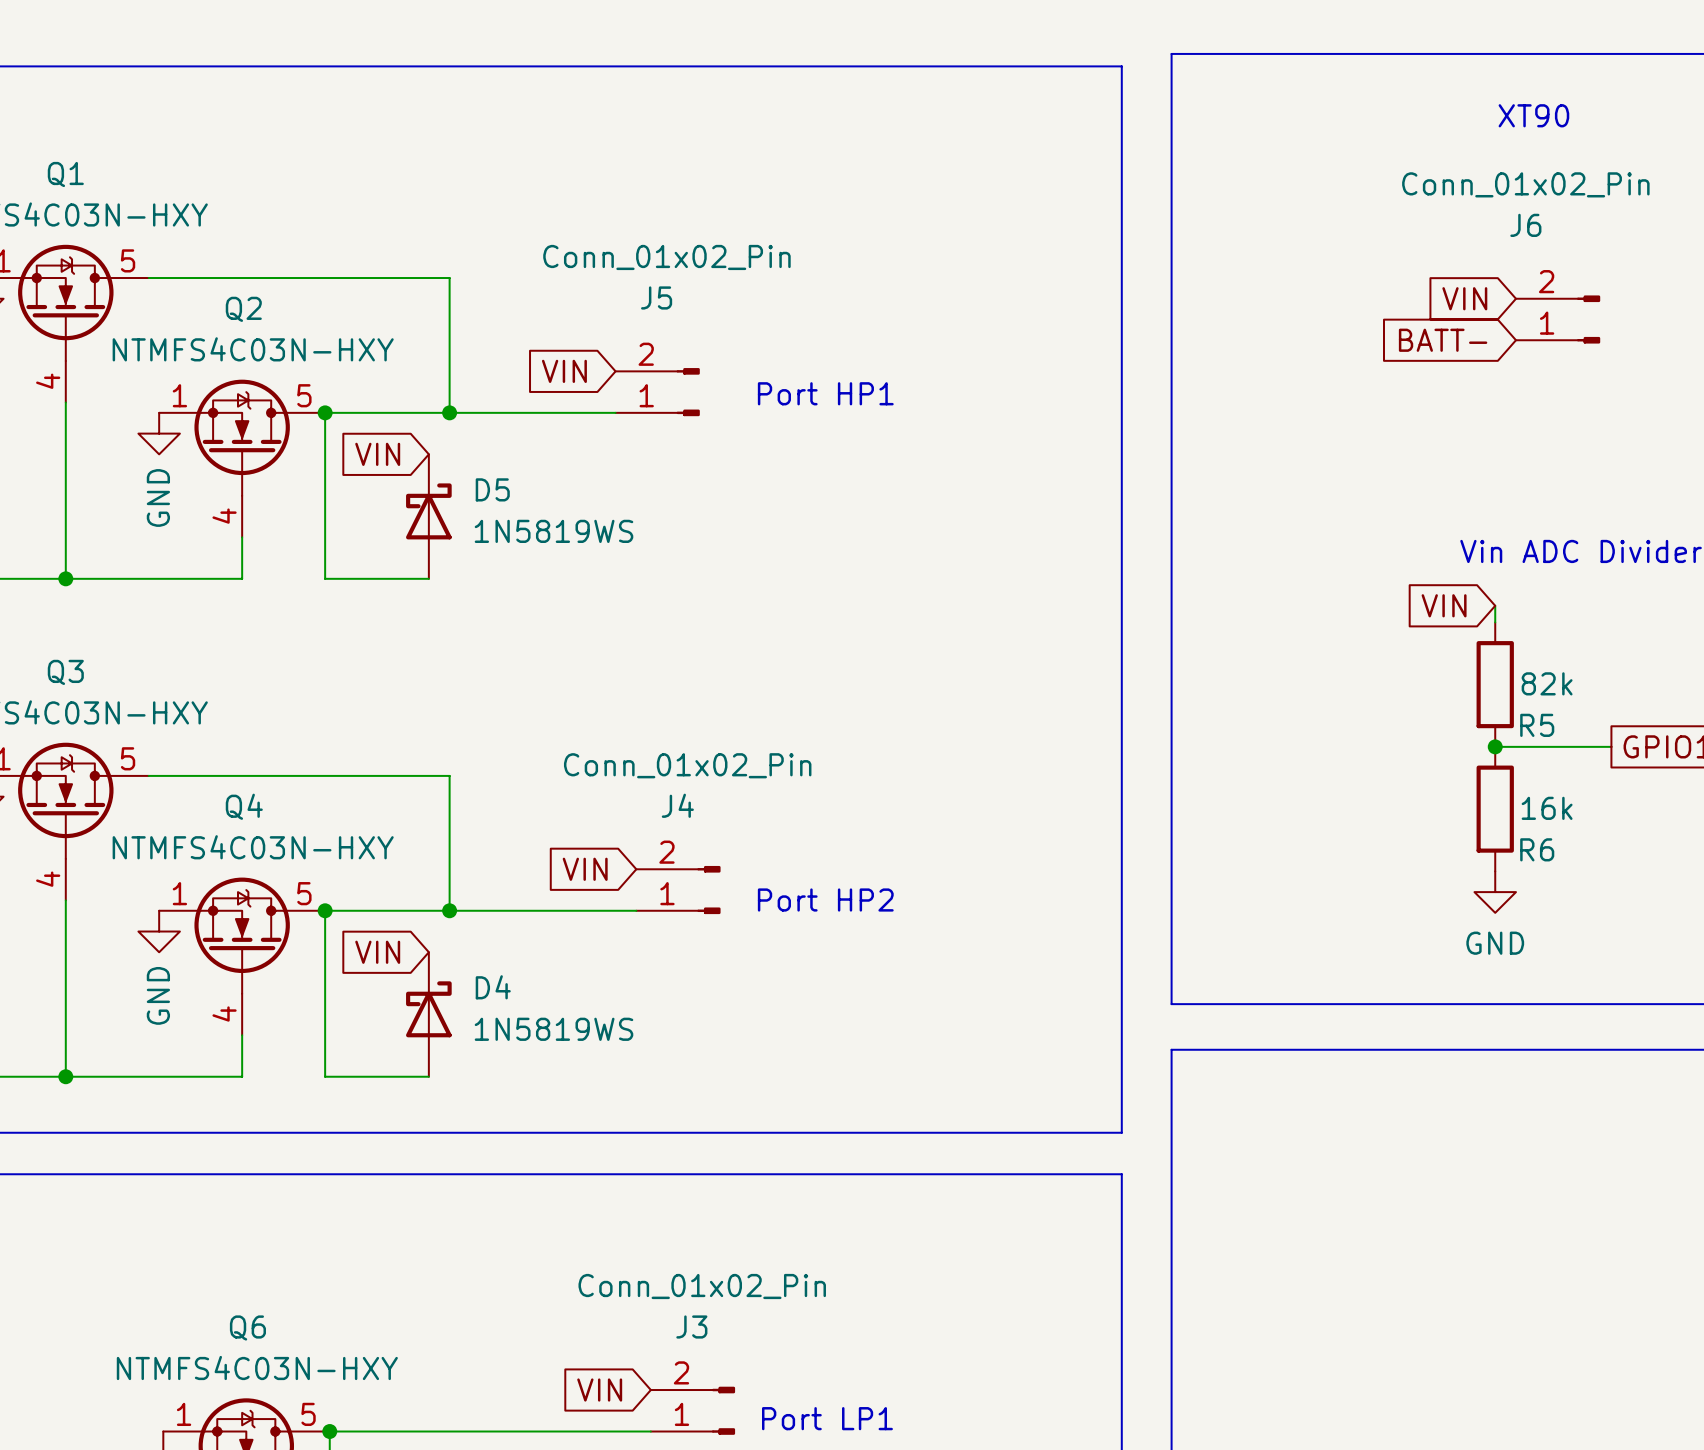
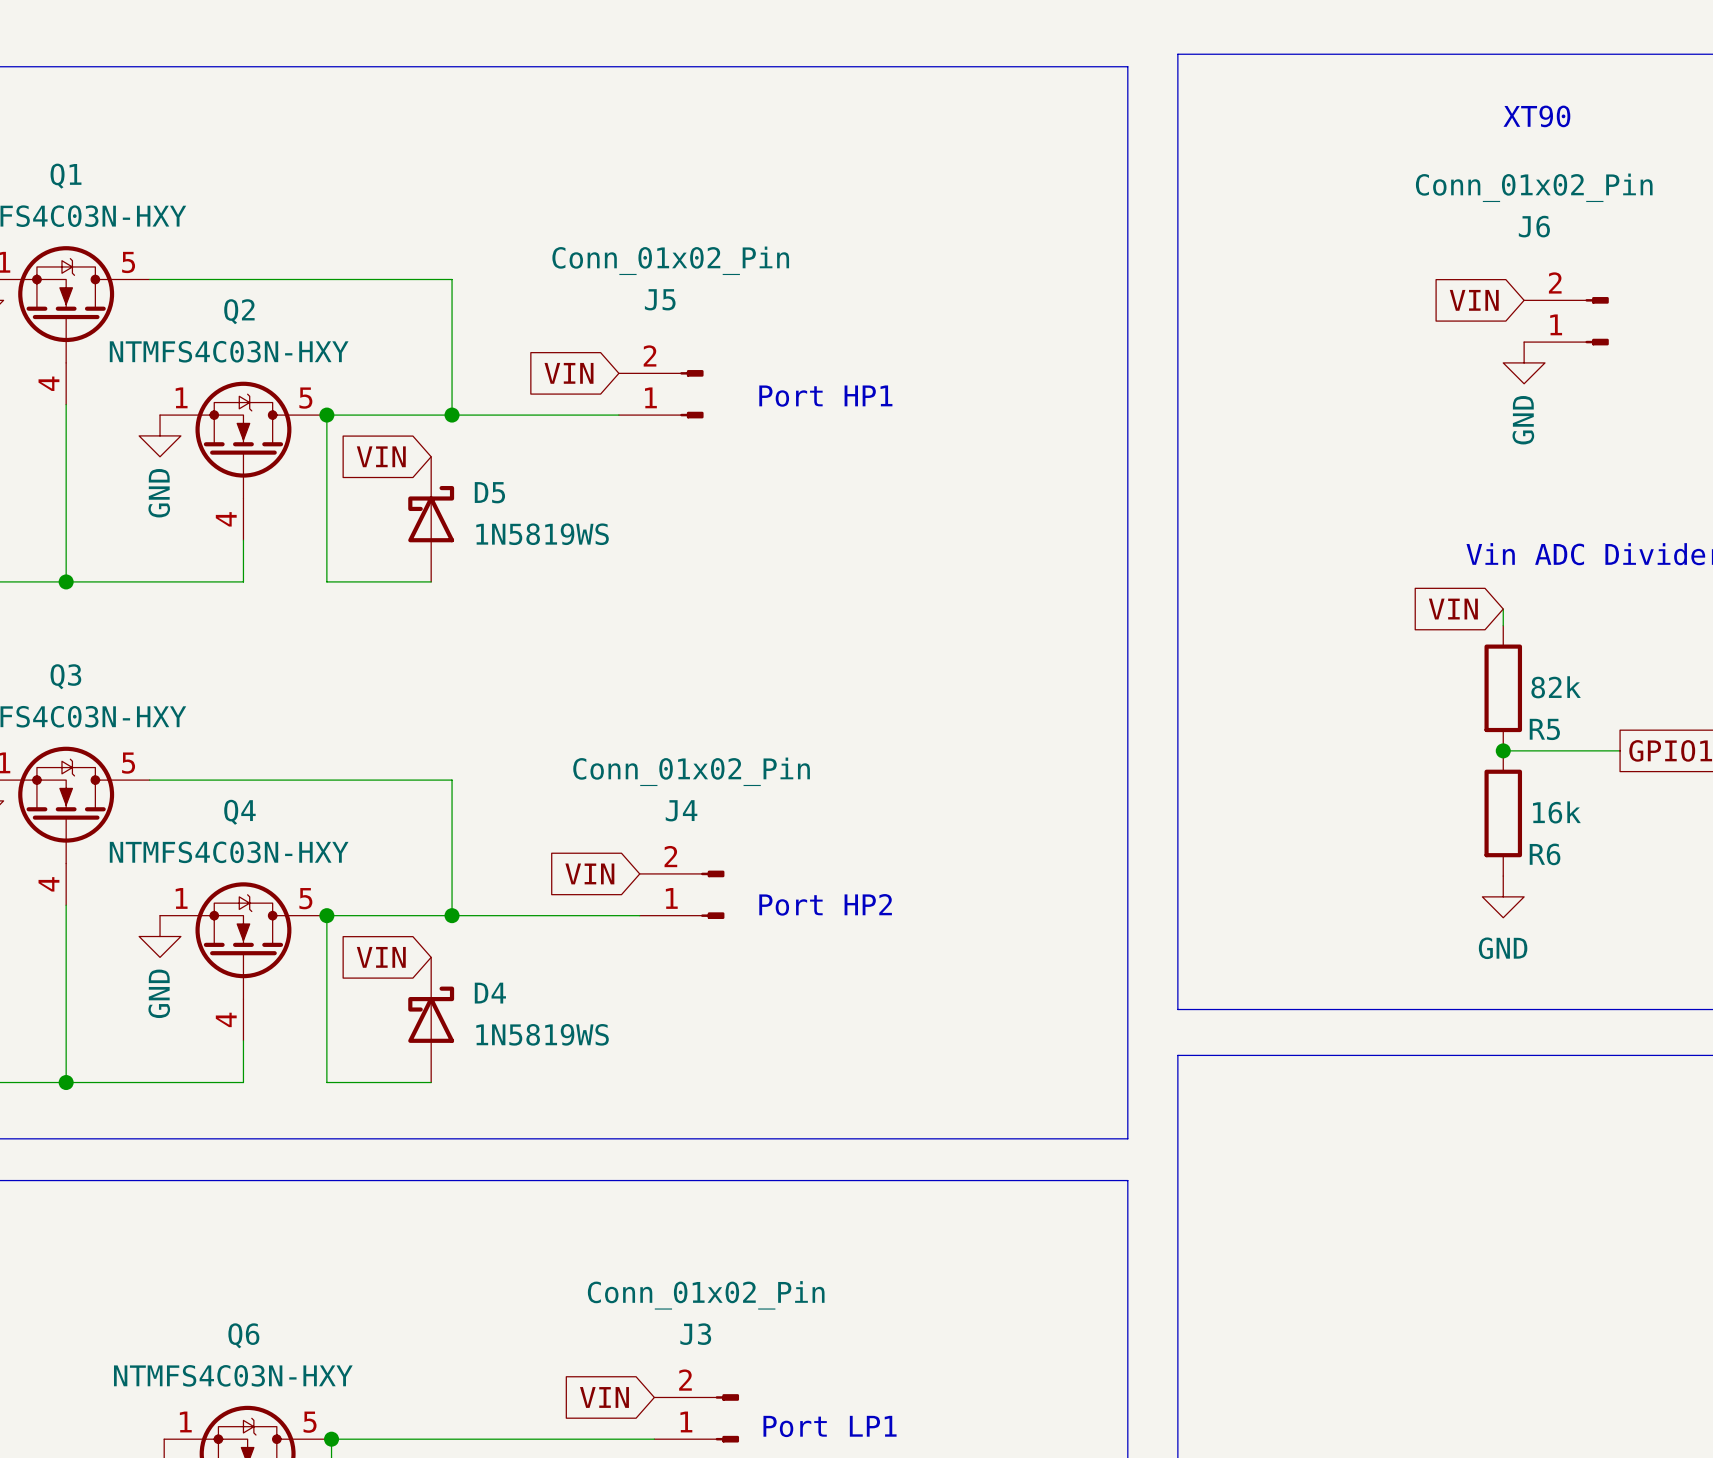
global label: BATT- (1443, 340) -> none
power symbol: none -> GND (1524, 362)

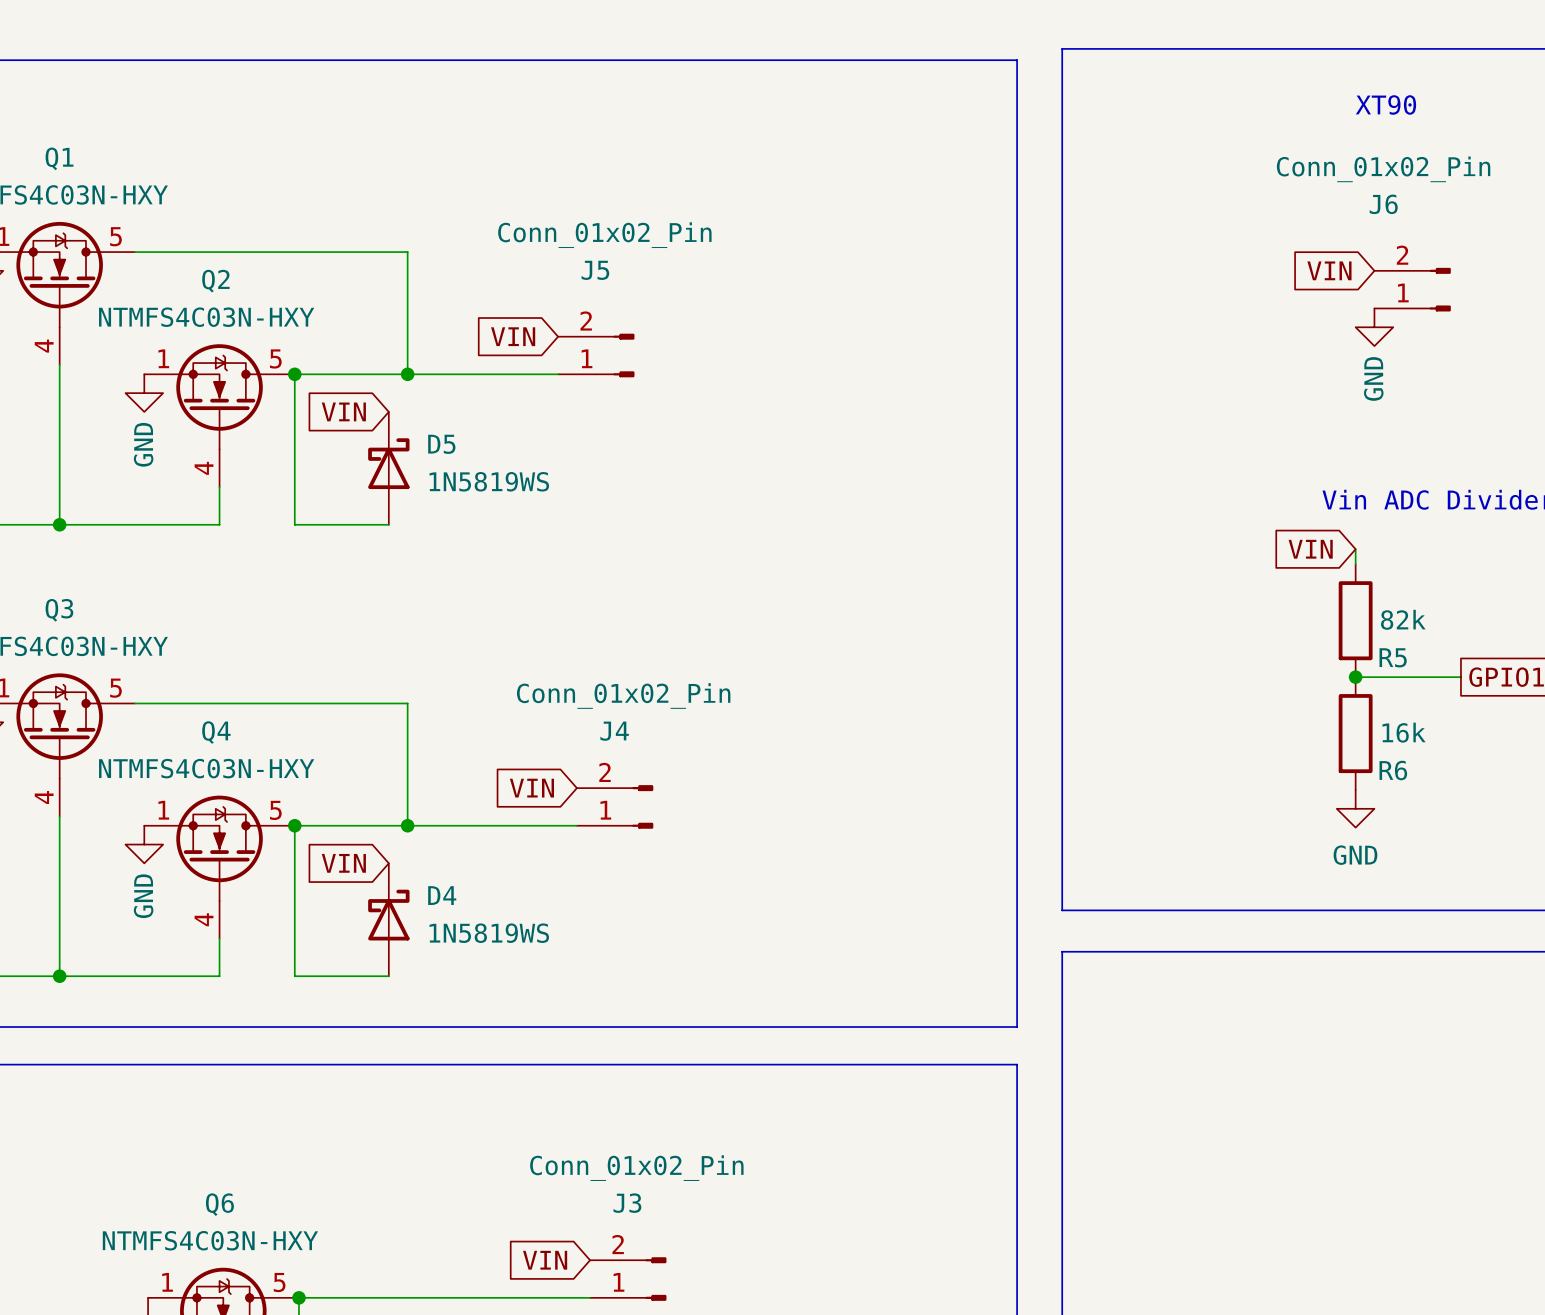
text: Port HP1 (825, 396) -> none
text: Port HP2 (825, 904) -> none
text: Port LP1 (830, 1426) -> none

